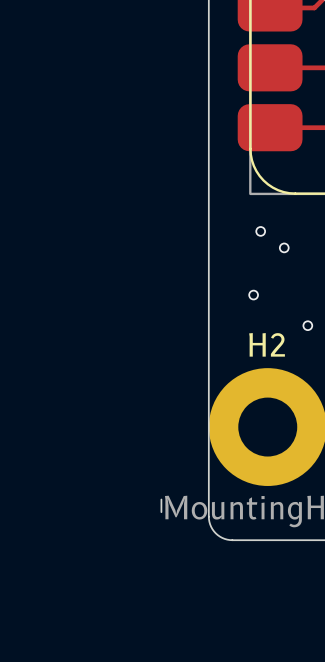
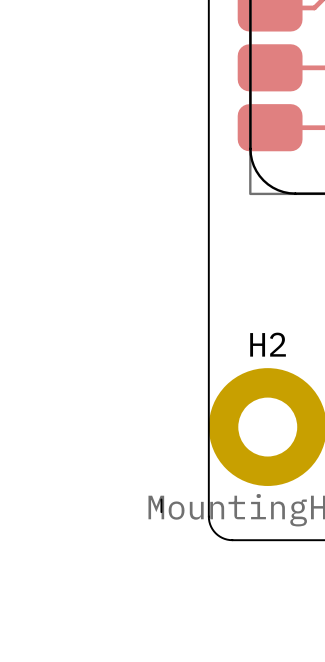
via: (260, 231) -> none
via: (284, 247) -> none
via: (253, 295) -> none
via: (307, 325) -> none

